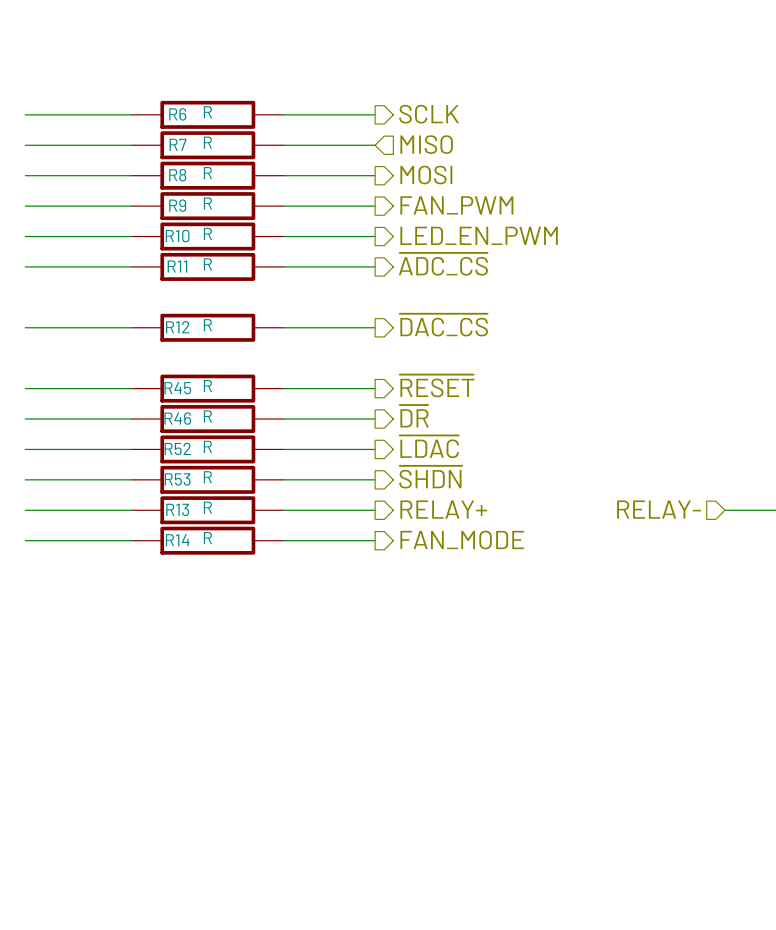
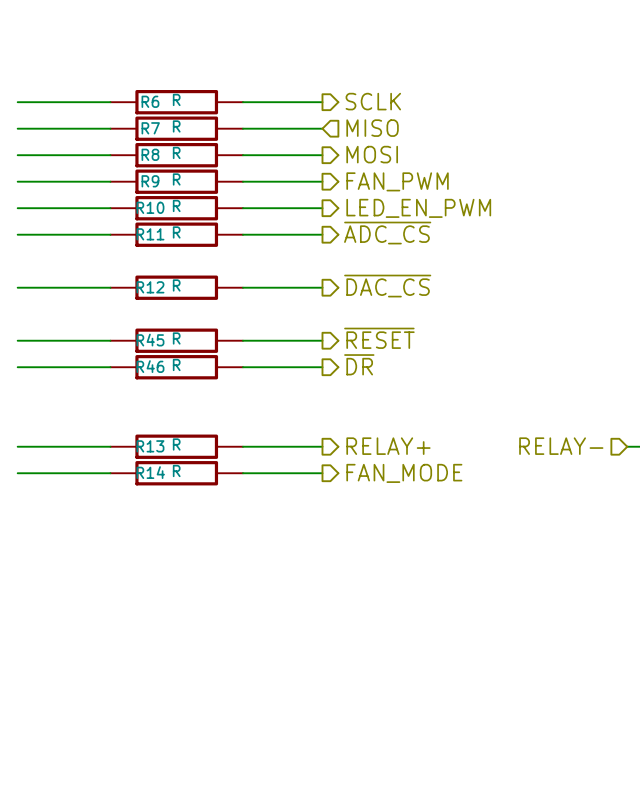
hierarchical label: ~{LDAC} (429, 446) -> none
wire: (25, 449) (131, 449) -> none
R52: R (207, 449) -> none
wire: (283, 449) (375, 449) -> none
hierarchical label: ~{SHDN} (430, 477) -> none
wire: (25, 479) (131, 479) -> none
R53: R (207, 479) -> none
wire: (283, 479) (375, 479) -> none

